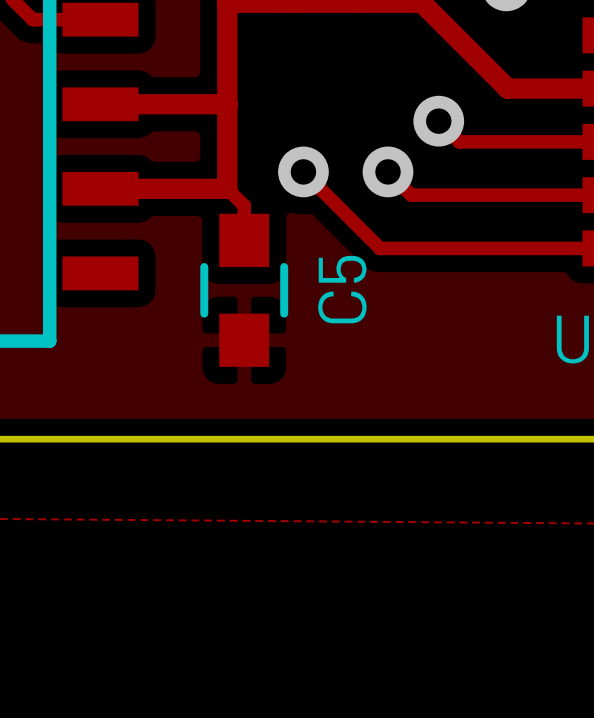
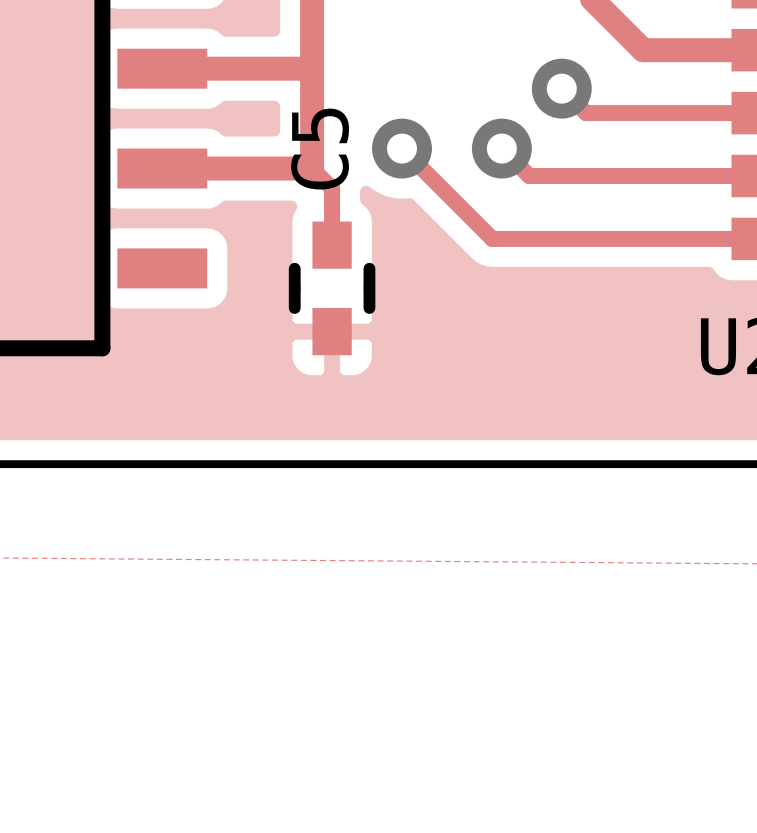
C5 footprint: [200, 213, 289, 367] -> [288, 221, 376, 356]
C5 name position: C5 (342, 289) -> C5 (320, 149)

